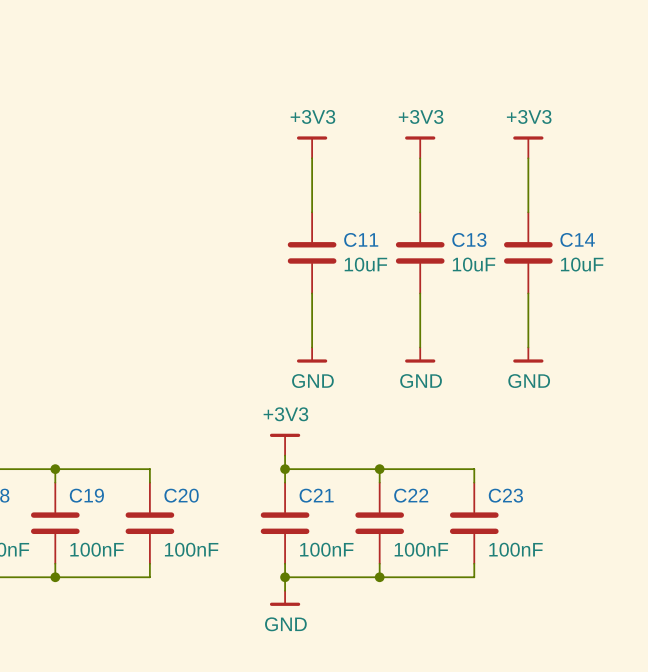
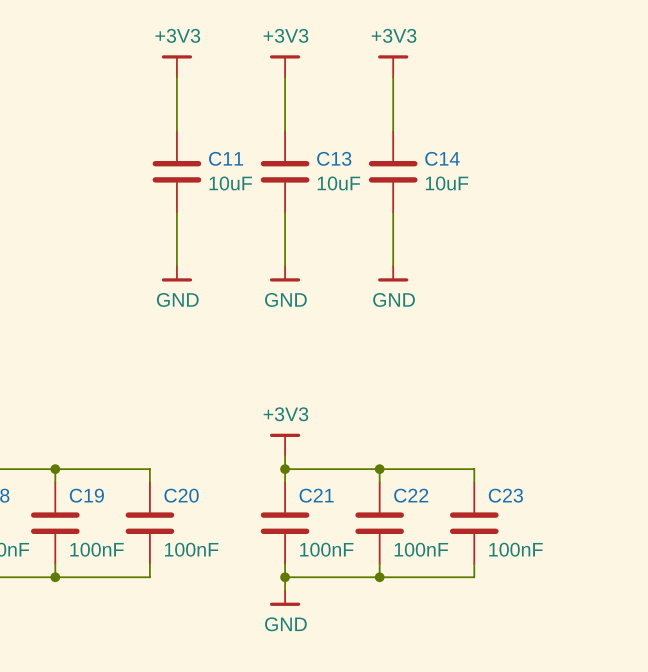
power symbol: none -> +3V3 (176, 66)
power symbol: none -> +3V3 (285, 66)
power symbol: none -> +3V3 (393, 66)
power symbol: +3V3 (312, 147) -> none
power symbol: +3V3 (420, 147) -> none
power symbol: +3V3 (528, 147) -> none
wire: (312, 158) (312, 212) -> (176, 77) (176, 131)
wire: (420, 158) (420, 212) -> (285, 77) (285, 131)
wire: (528, 158) (528, 212) -> (393, 77) (393, 131)
C11 position: (312, 252) -> (176, 171)
C13 position: (420, 252) -> (285, 171)
C14 position: (528, 252) -> (393, 171)
power symbol: none -> GND (176, 273)
power symbol: none -> GND (285, 273)
power symbol: none -> GND (393, 273)
wire: (312, 293) (312, 347) -> (176, 212) (176, 266)
wire: (420, 293) (420, 347) -> (285, 212) (285, 266)
wire: (528, 293) (528, 347) -> (393, 212) (393, 266)
power symbol: GND (312, 355) -> none
power symbol: GND (420, 355) -> none
power symbol: GND (528, 355) -> none

